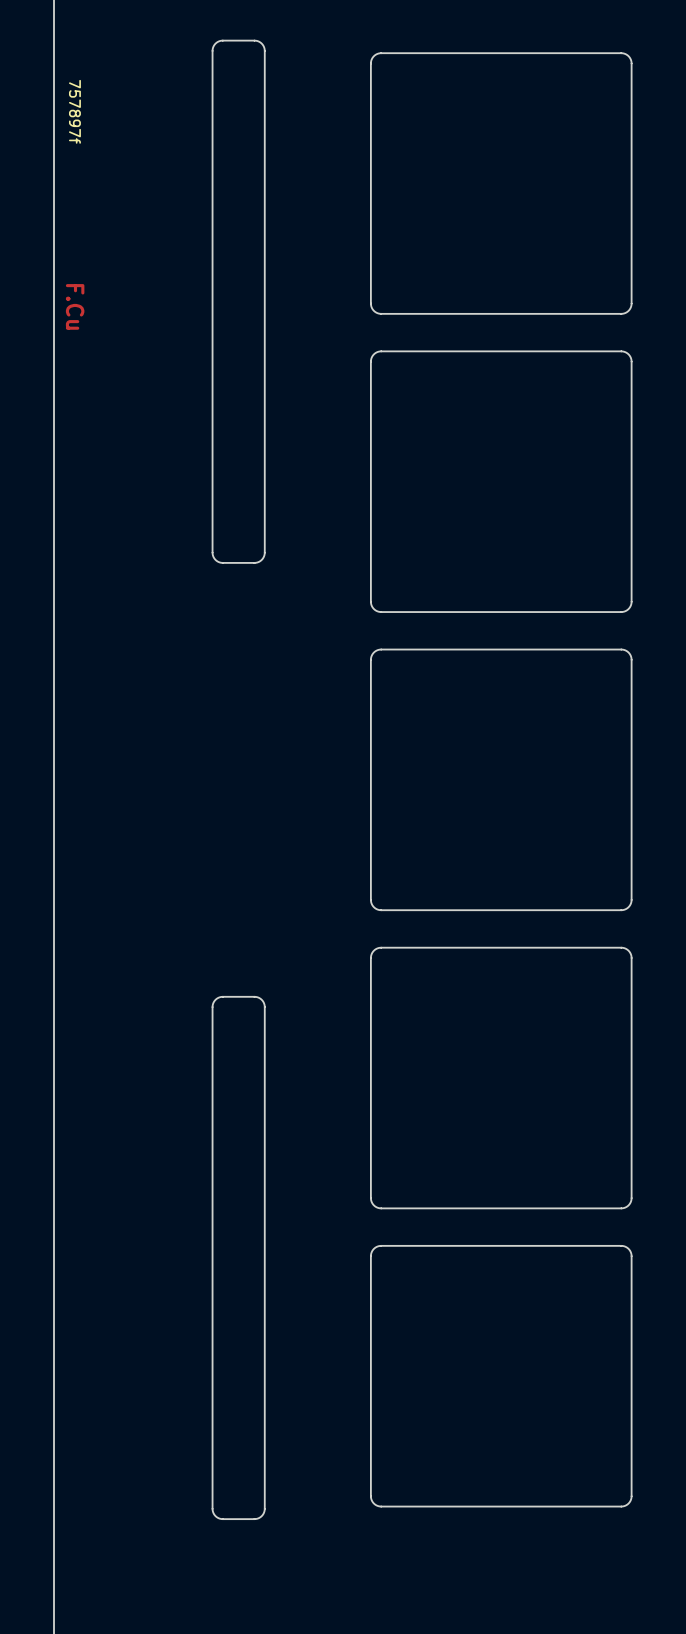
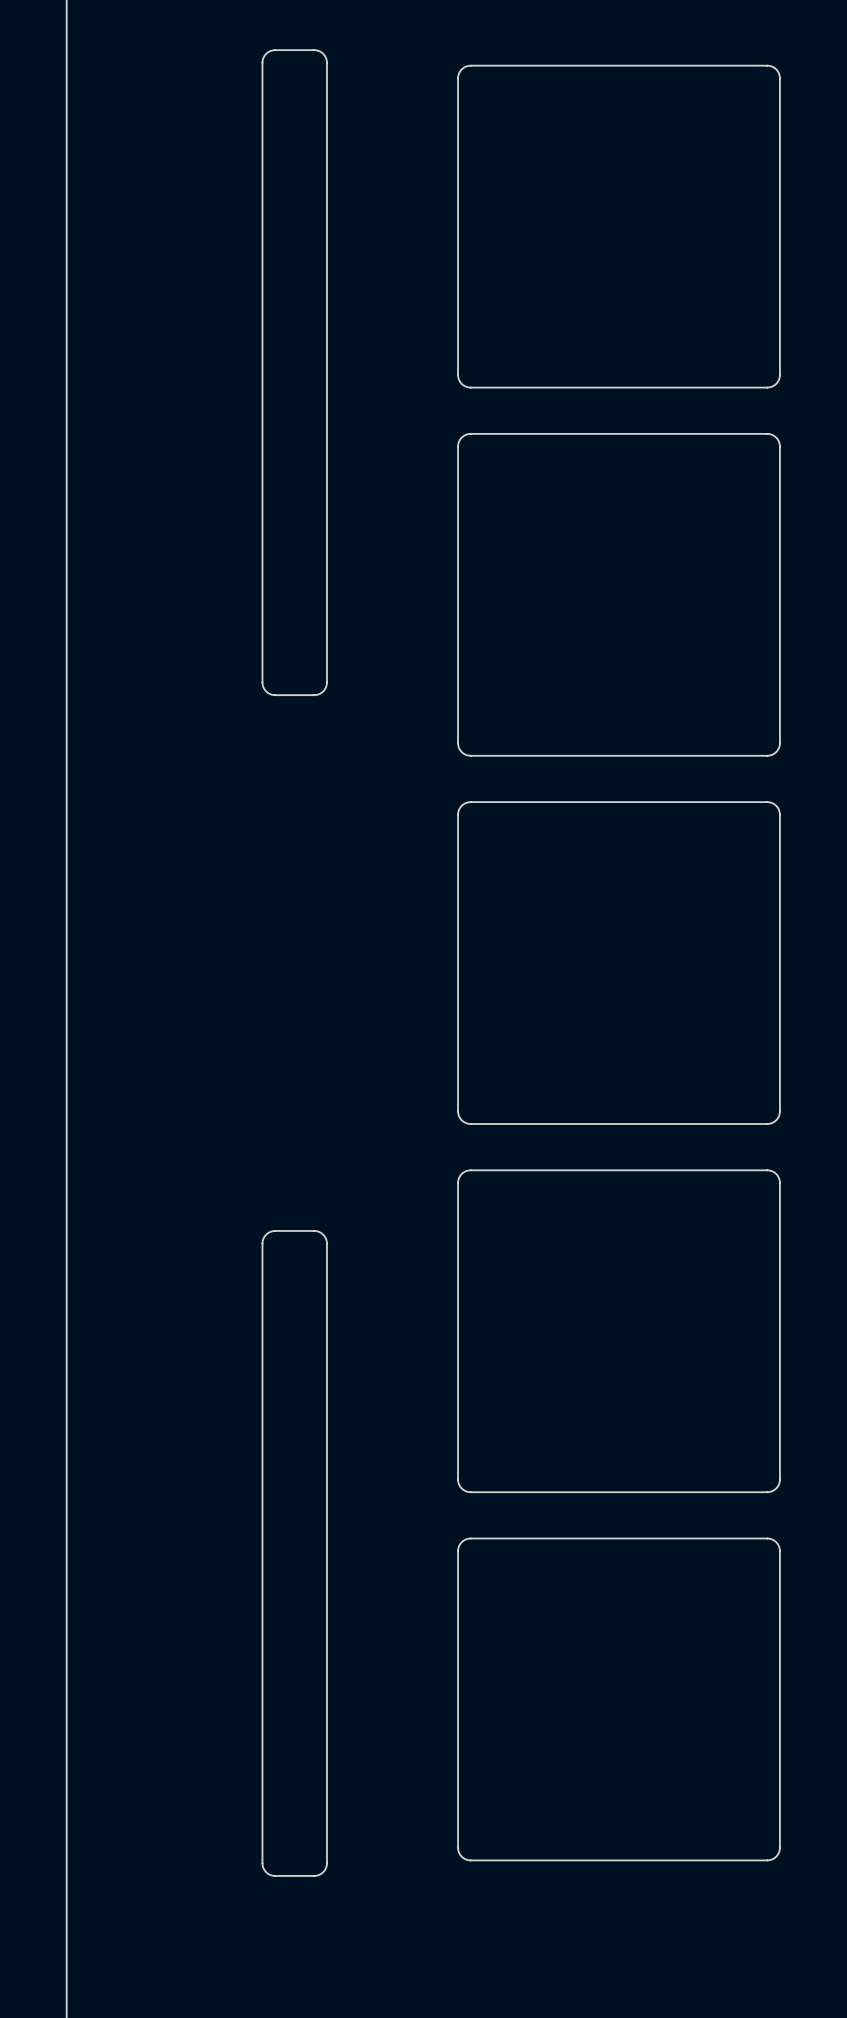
text: 757897f (74, 111) -> none
text: F.Cu (75, 306) -> none

